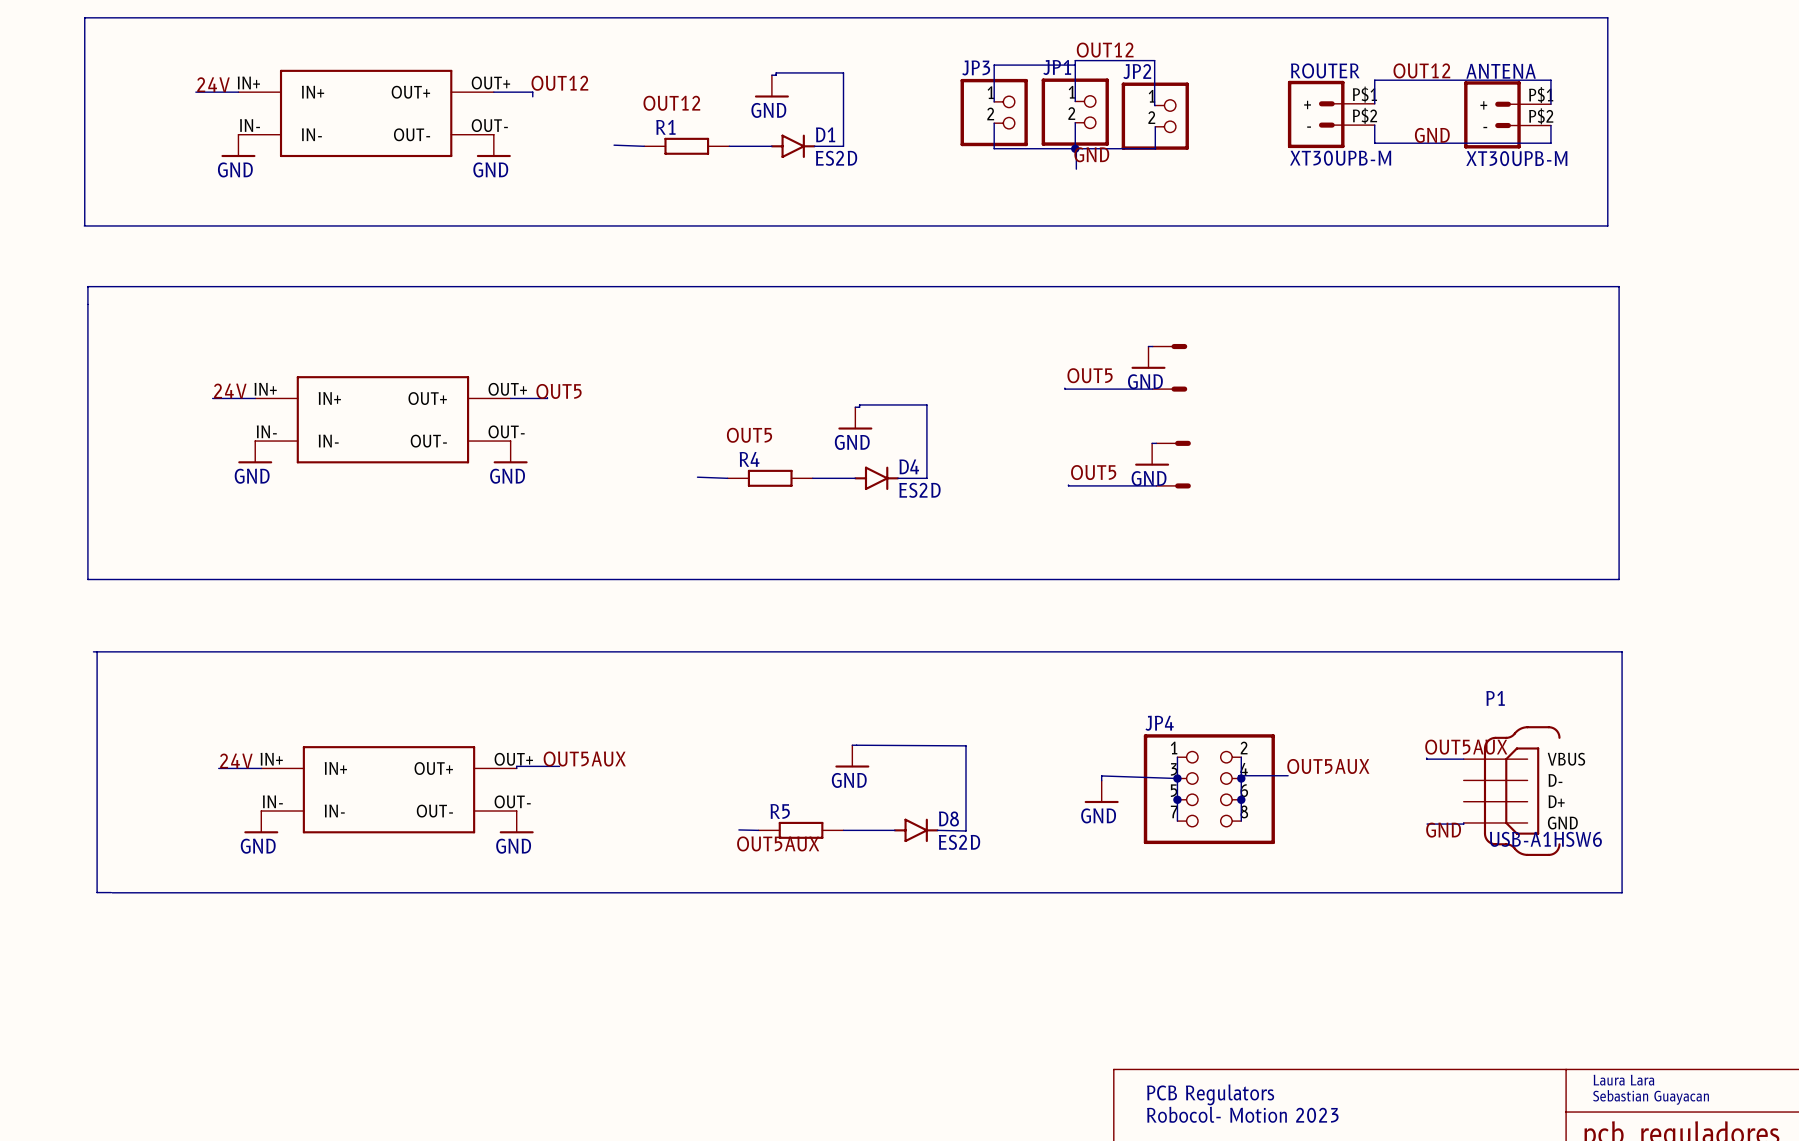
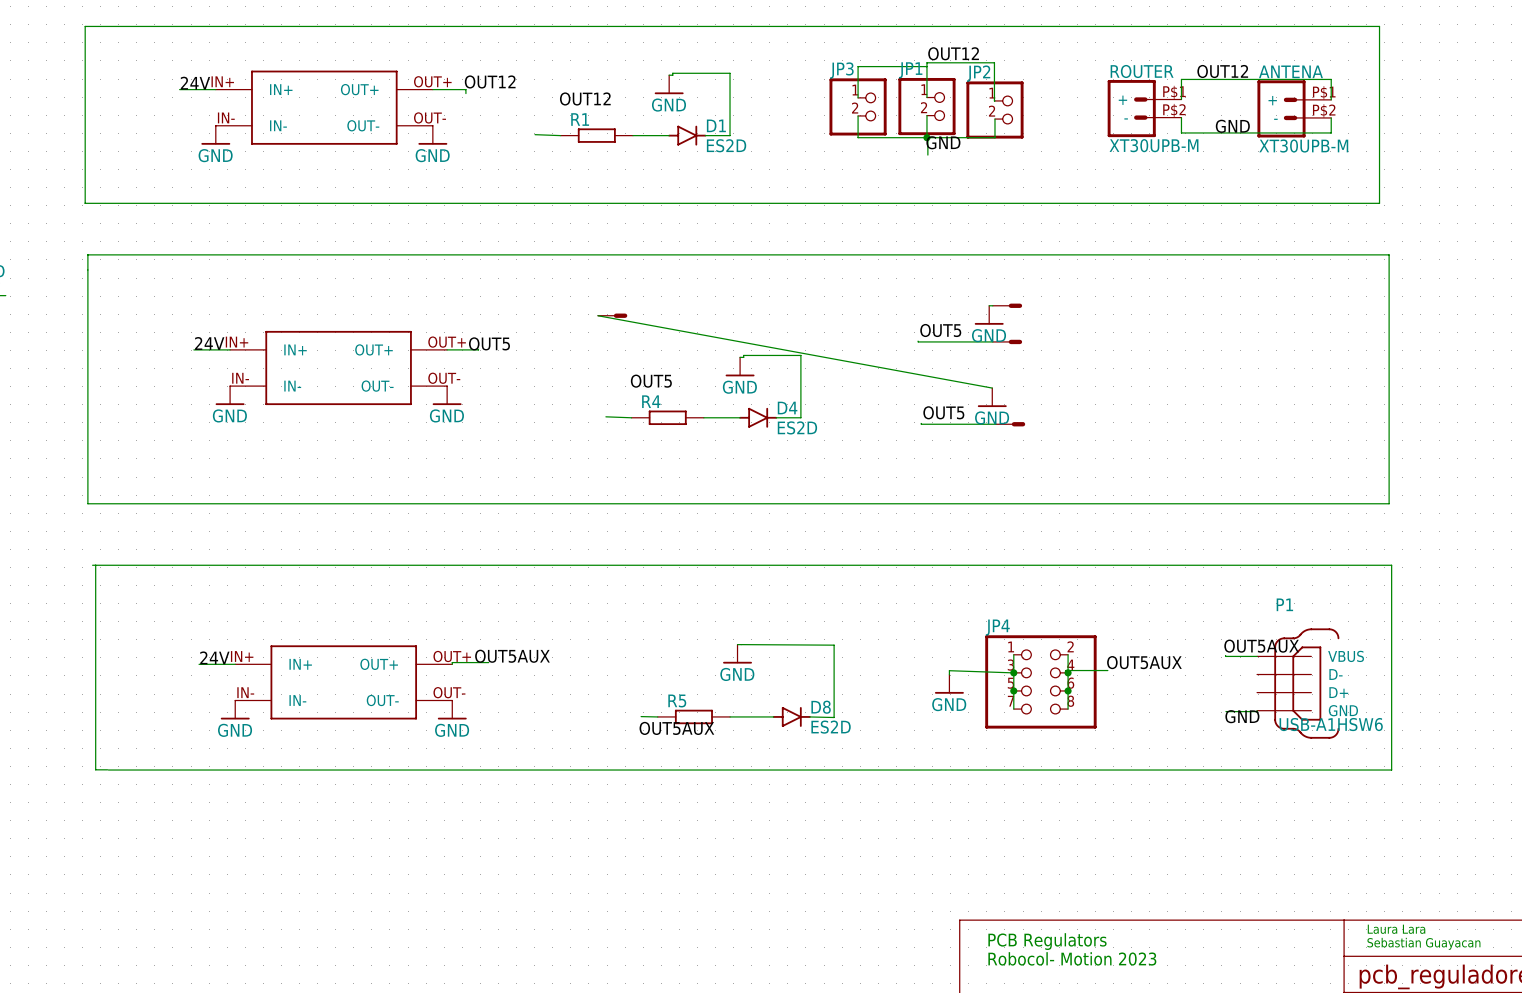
part: none -> (612, 315)
wire: (1152, 443) (1156, 443) -> (992, 388) (597, 315)
part: (1173, 443) -> none

